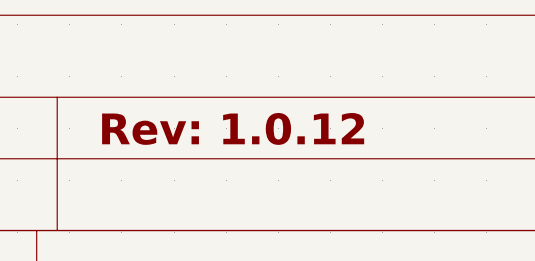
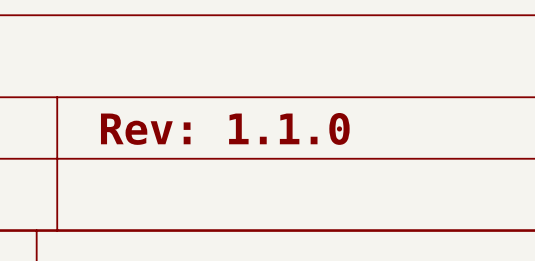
title block: Rev: 1.0.12 (233, 128) -> Rev: 1.1.0 (225, 128)

